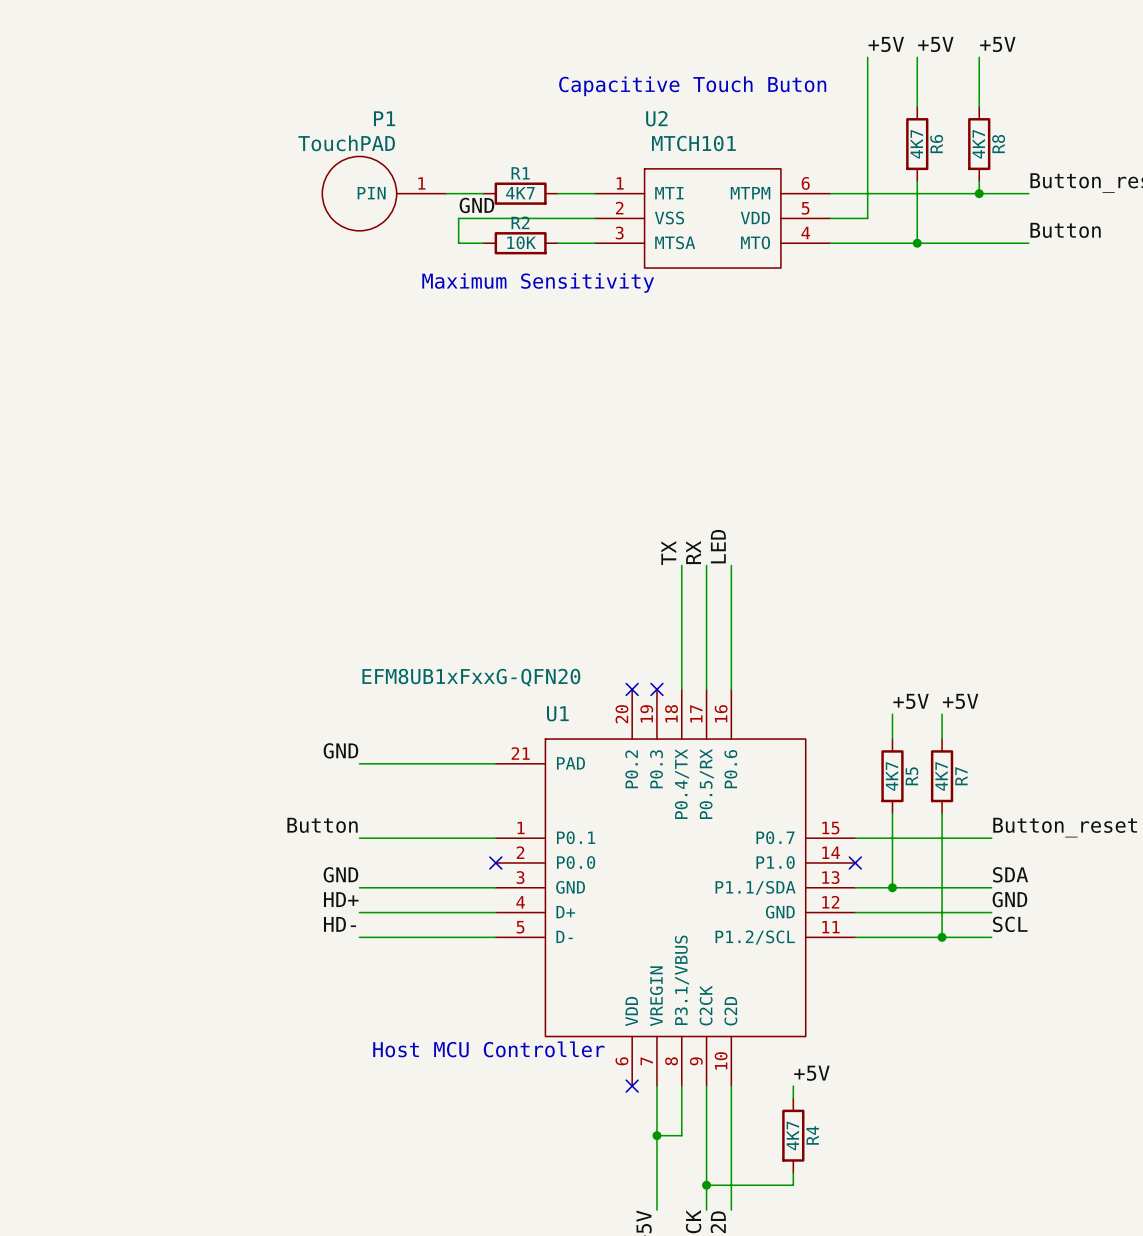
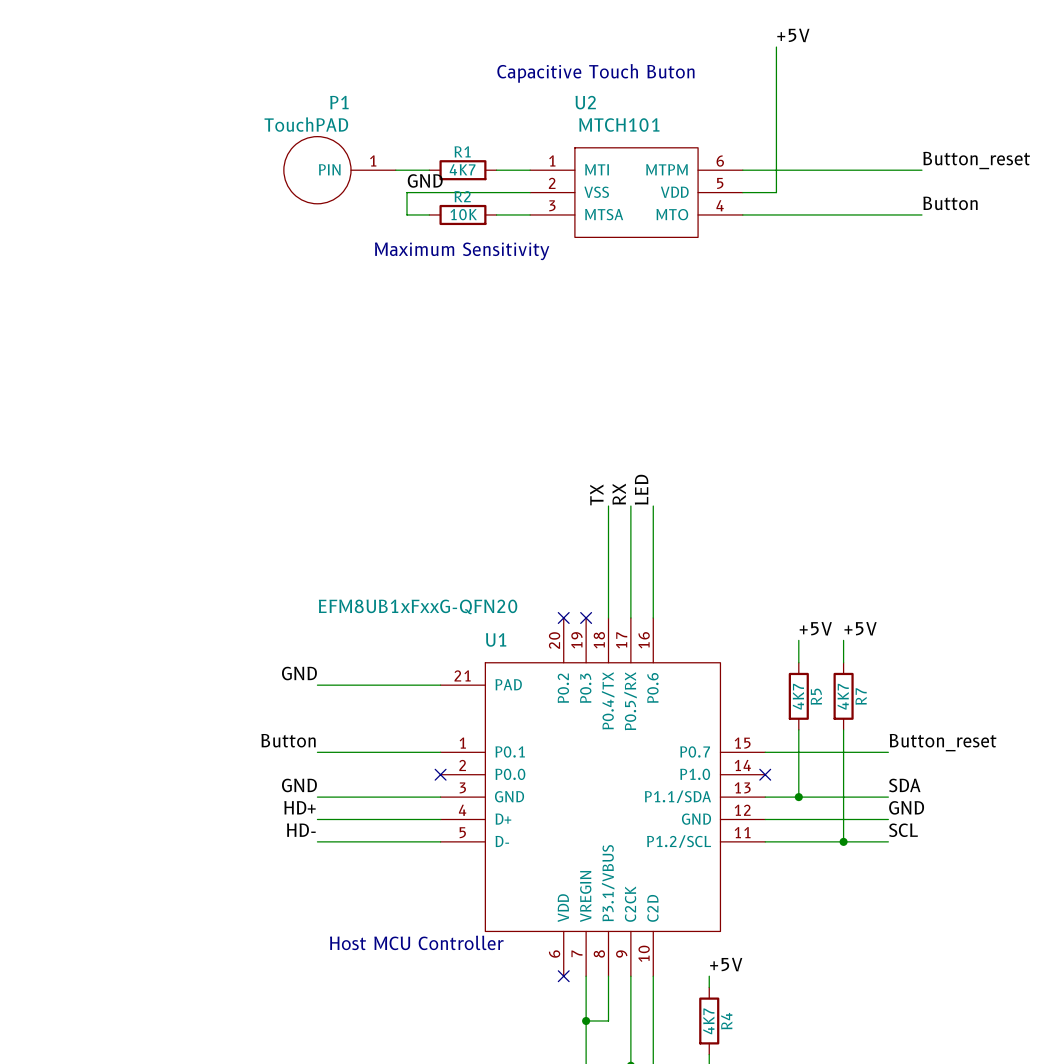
label: +5V (935, 44) -> none
label: +5V (997, 44) -> none
wire: (917, 57) (917, 106) -> none
wire: (979, 57) (979, 106) -> none
R6: 4K7 (917, 144) -> none
R8: 4K7 (979, 144) -> none
wire: (917, 181) (917, 243) -> none
wire: (979, 181) (979, 193) -> none
junction: (979, 193) -> none
junction: (917, 243) -> none

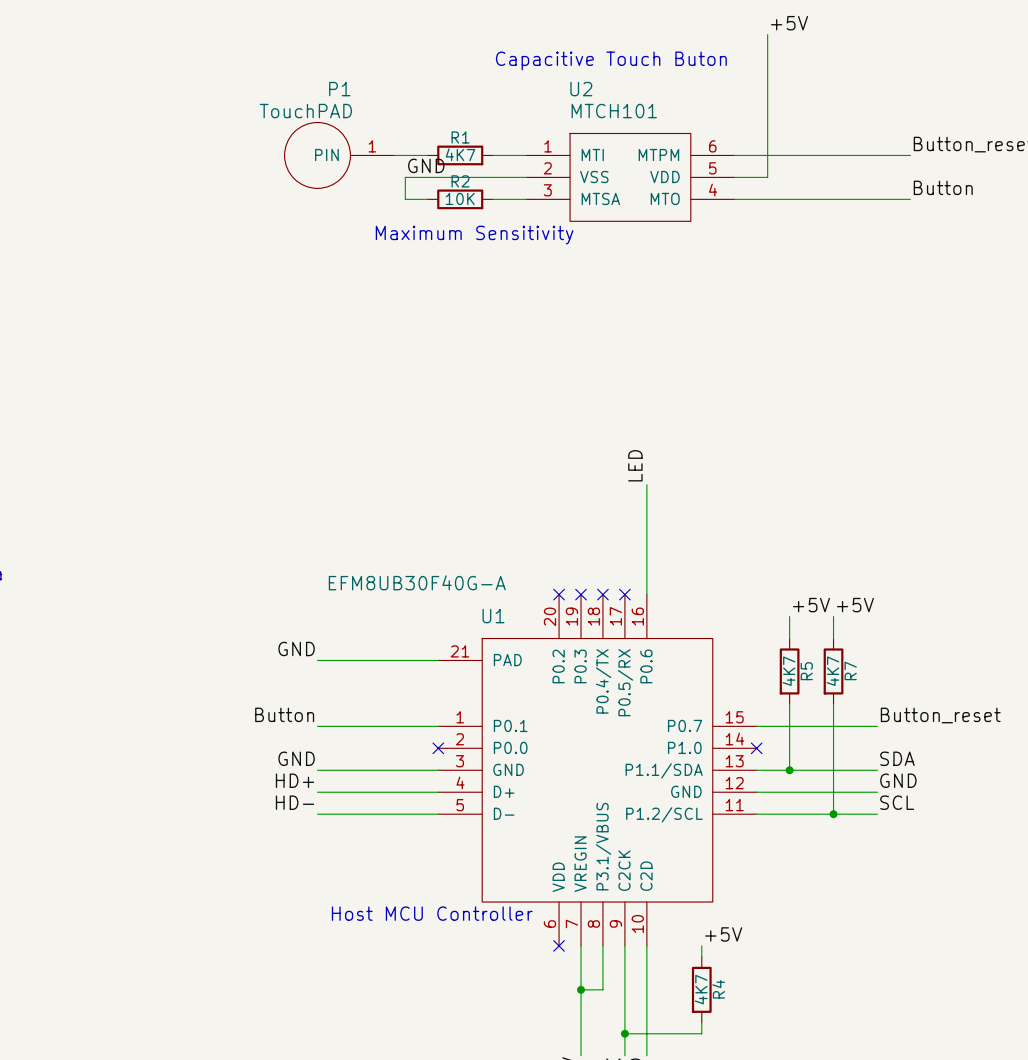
label: TX (596, 494) -> none
label: RX (619, 494) -> none
wire: (608, 506) (608, 617) -> none
wire: (630, 506) (630, 617) -> none
U1 value: EFM8UB1xFxxG-QFN20 (418, 606) -> EFM8UB30F40G-A (417, 582)
no-connect mark: none -> (602, 594)
no-connect mark: none -> (624, 594)

